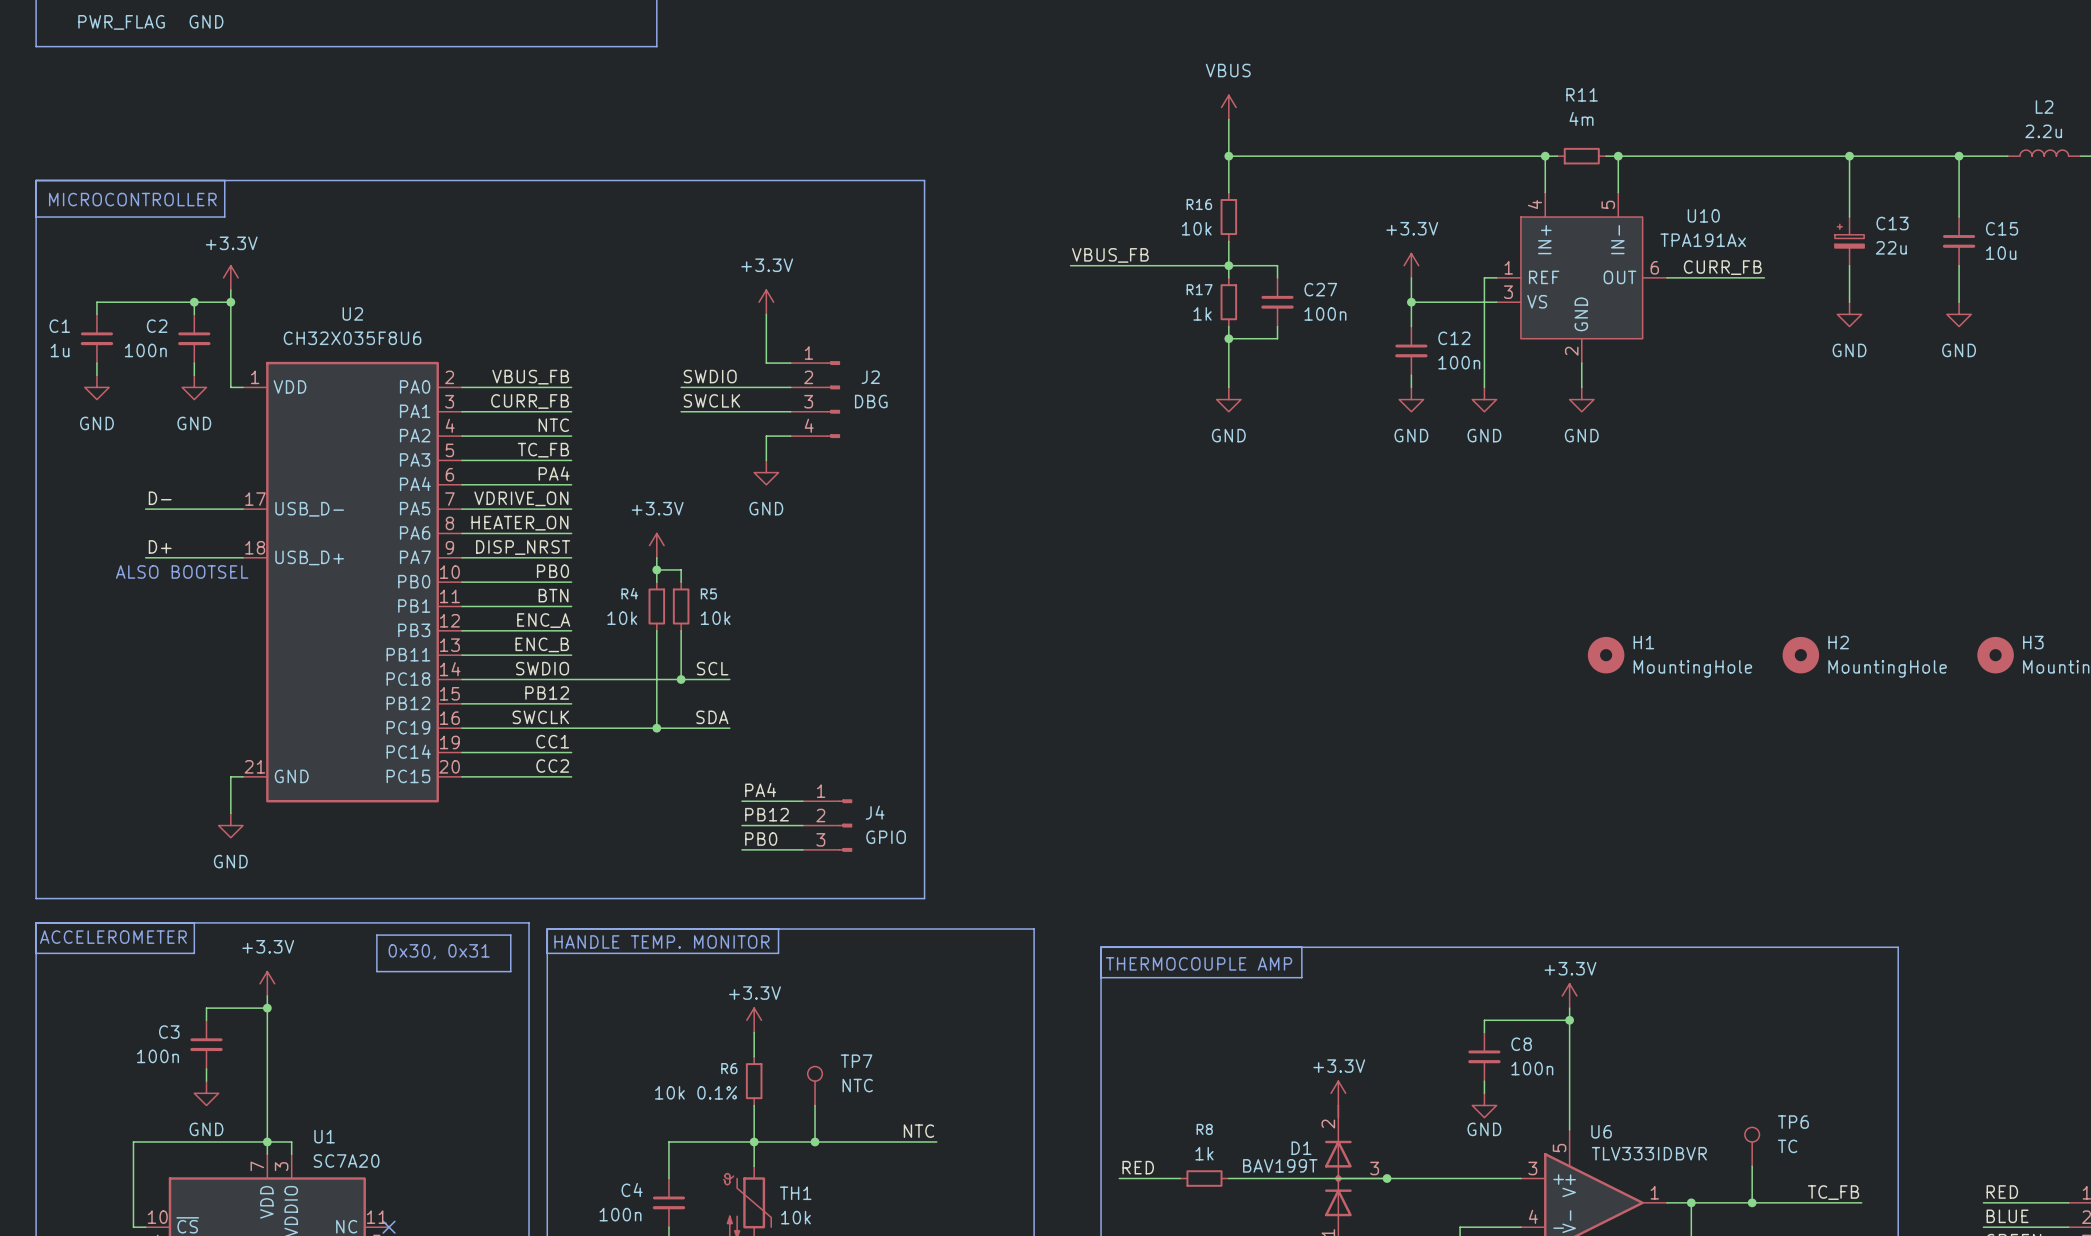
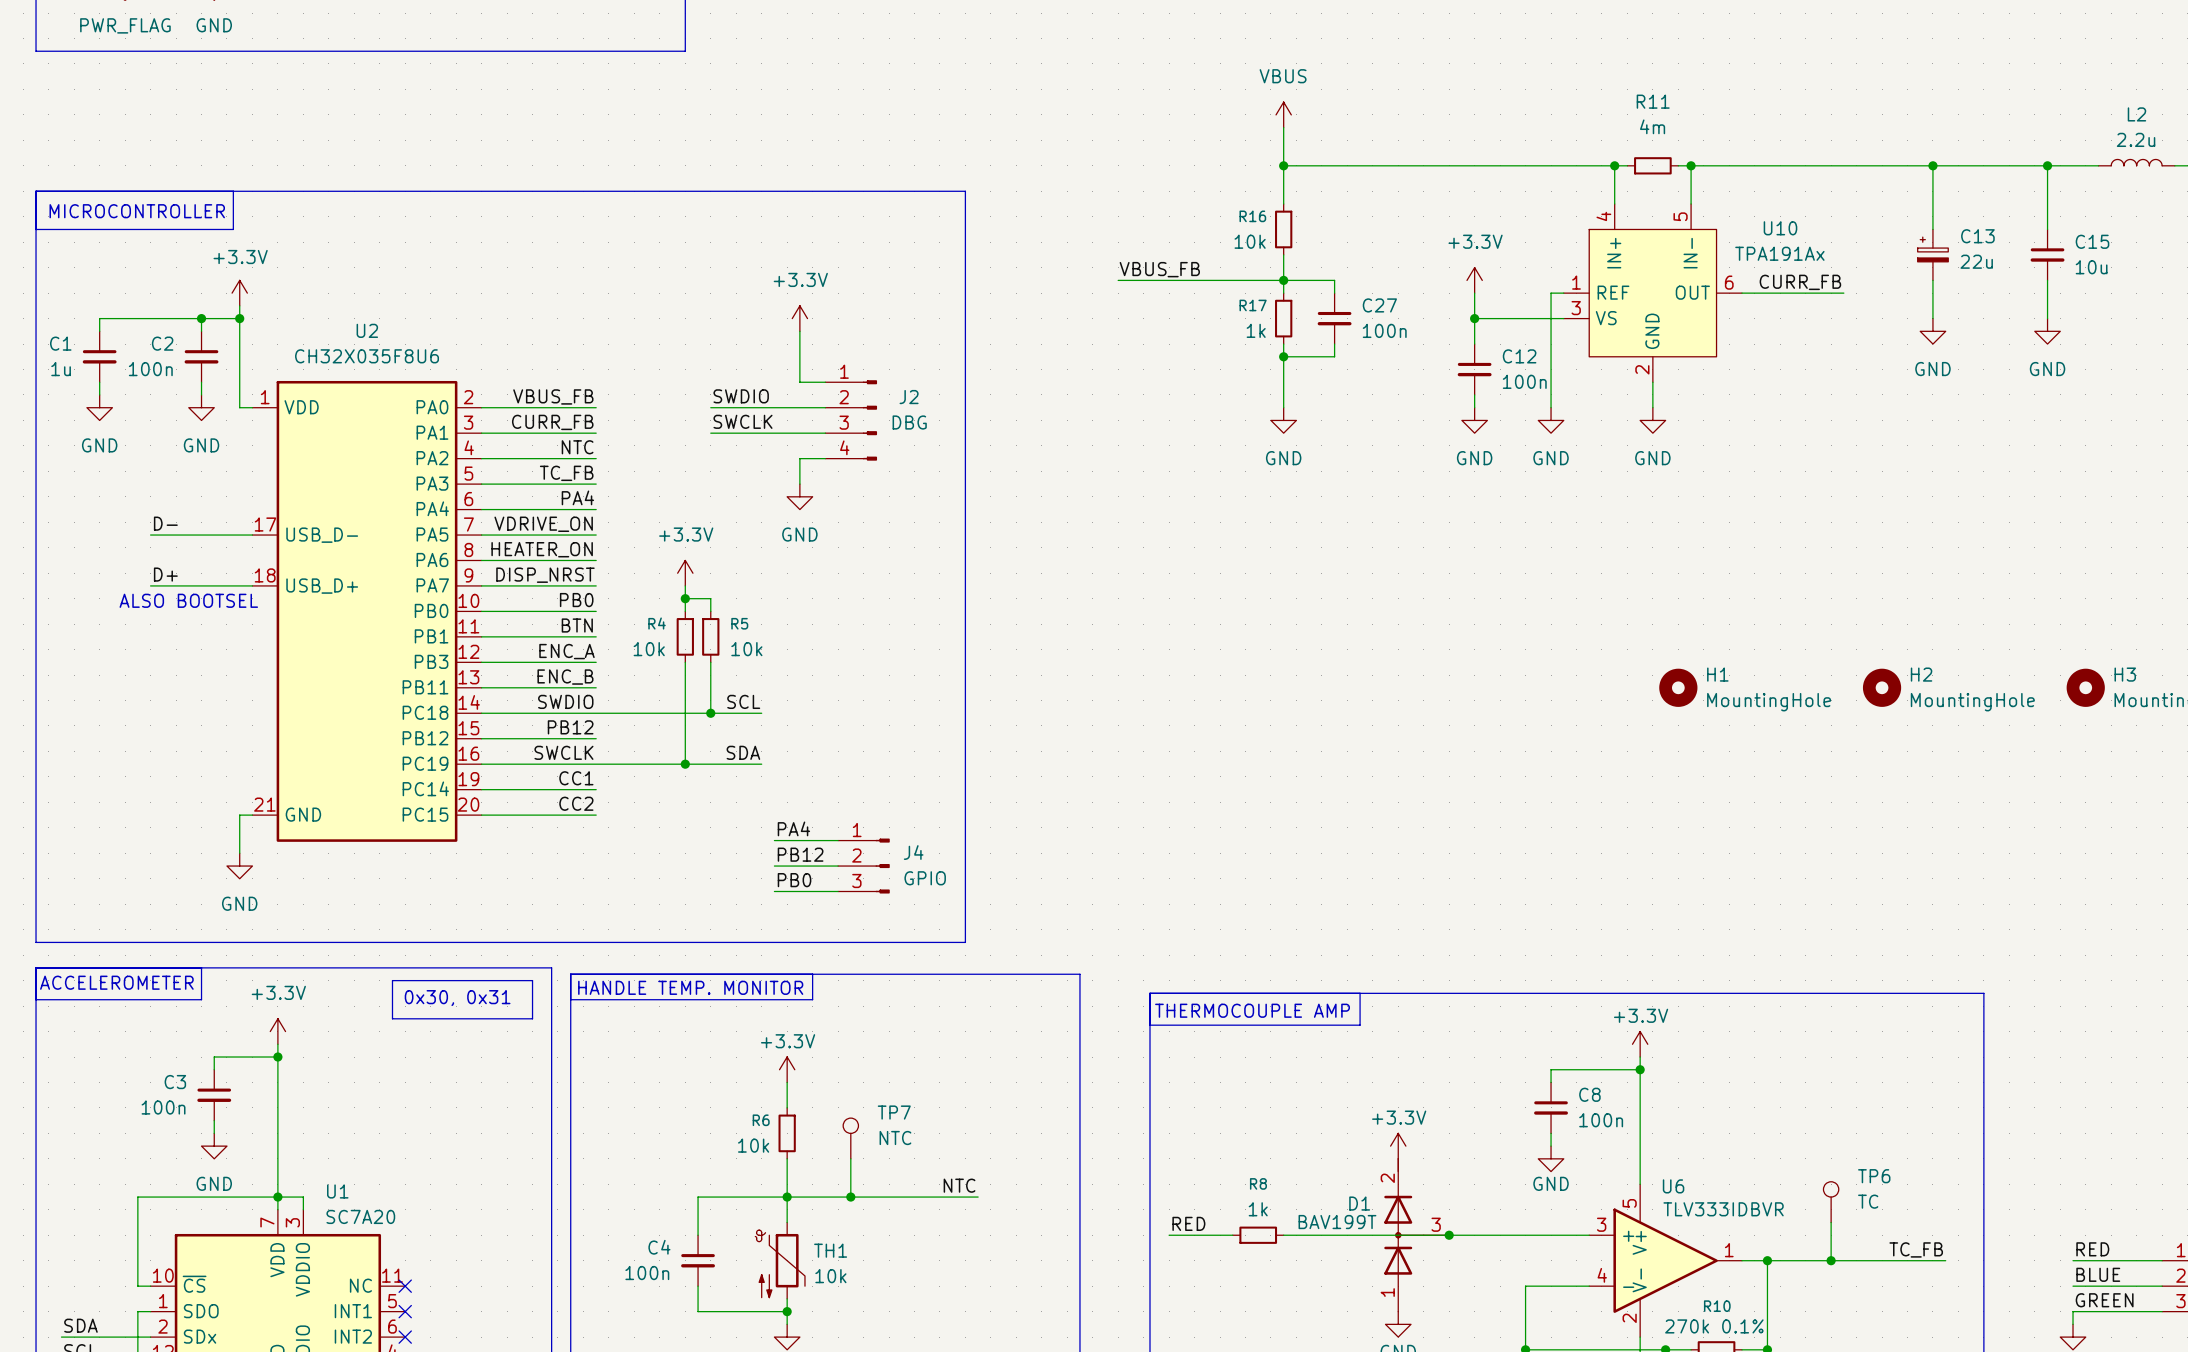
R6 value: 10k 0.1% (696, 1092) -> 10k (753, 1145)

